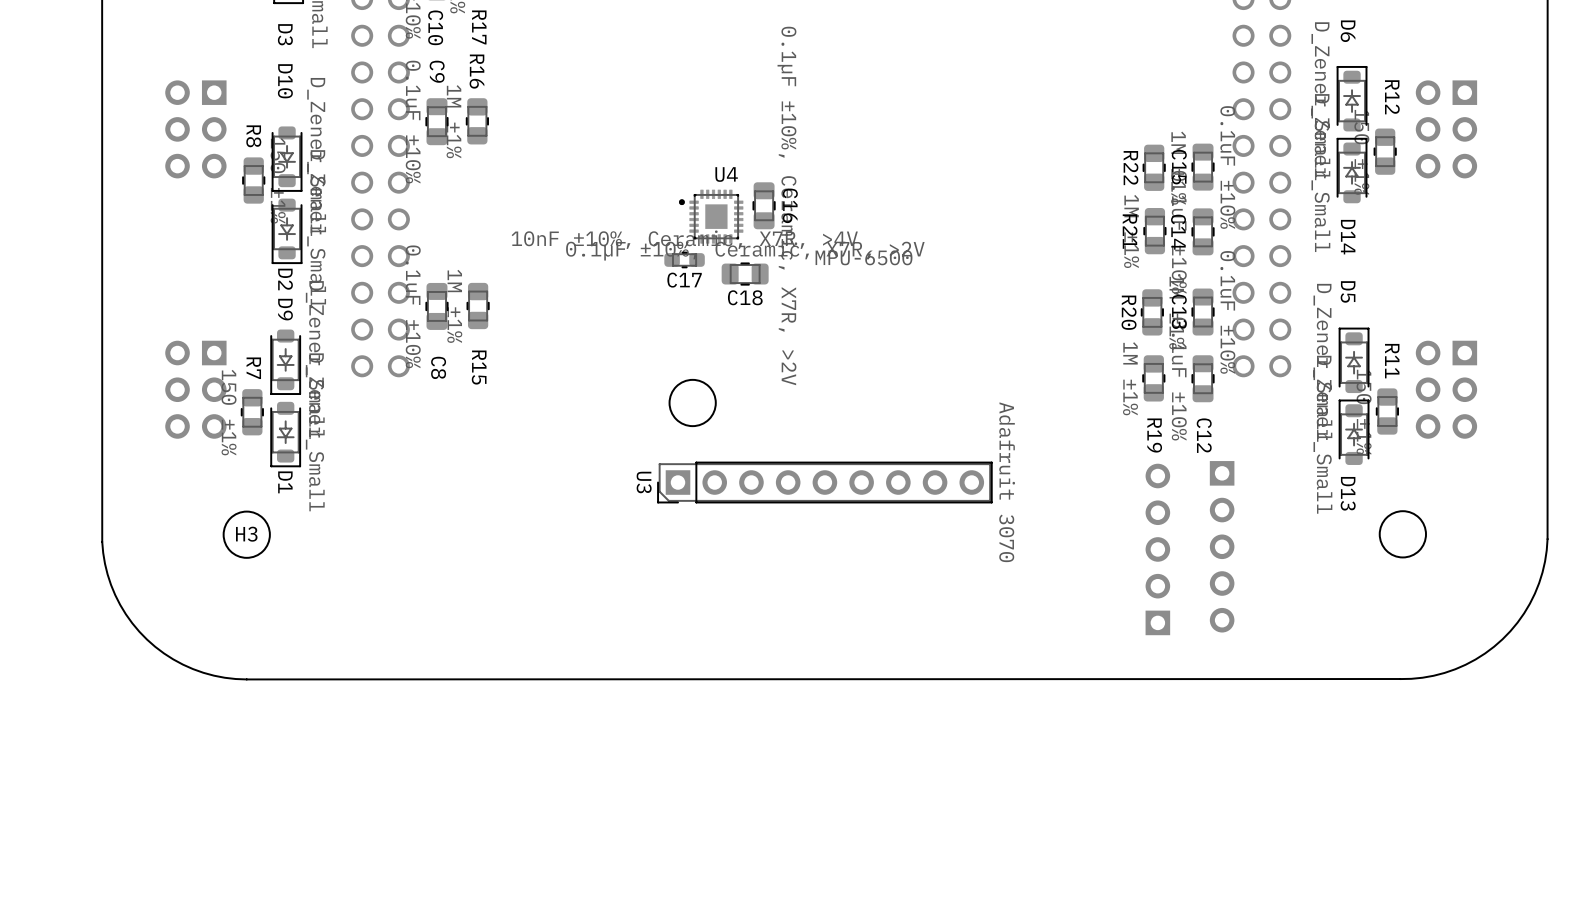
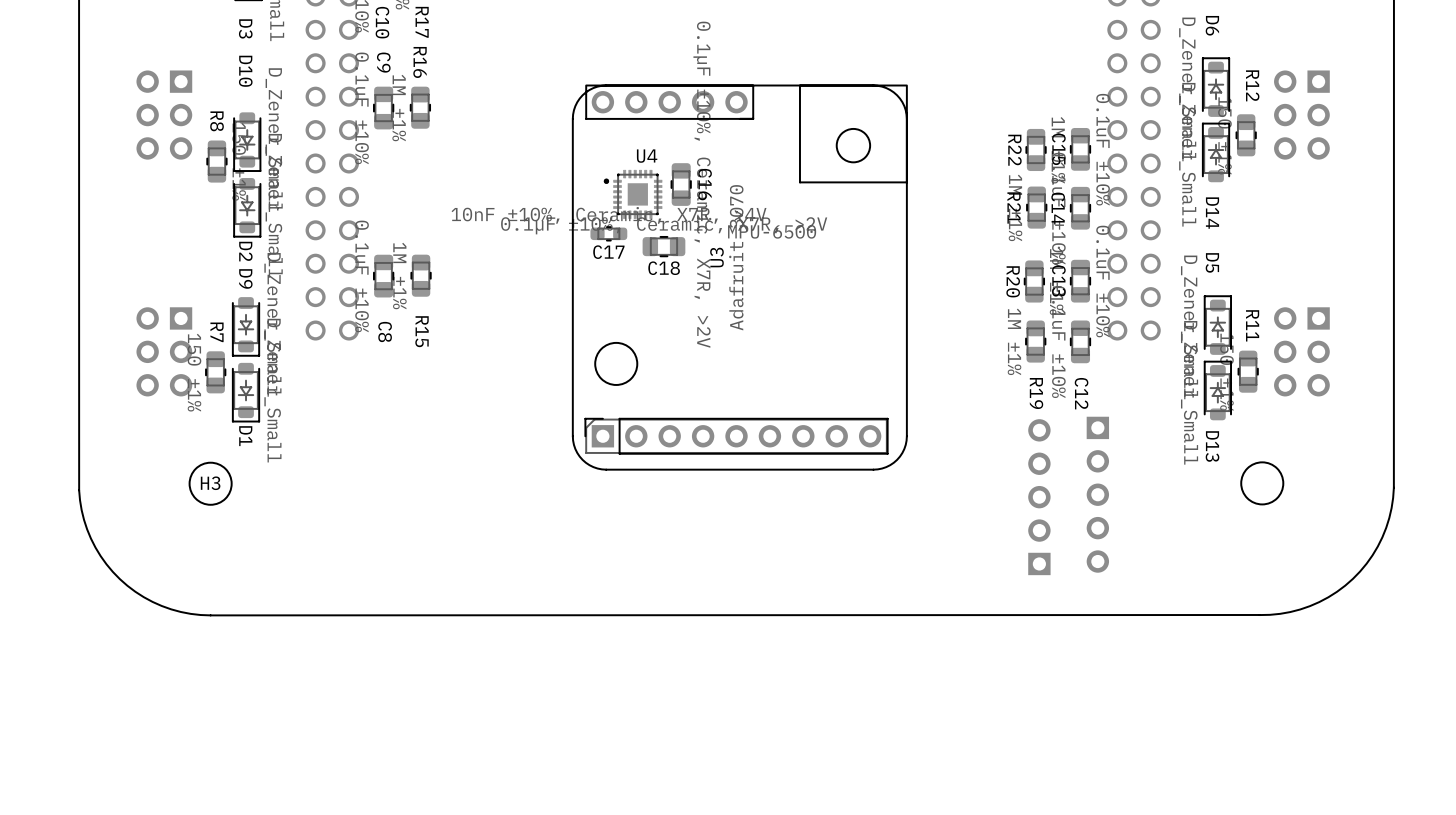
U3 footprint: [657, 461, 993, 504] -> [572, 84, 908, 471]
U3 name position: U3 (644, 482) -> U3 (716, 257)
U3 value position: Adafruit 3070 (1007, 482) -> Adafruit 3070 (736, 257)

